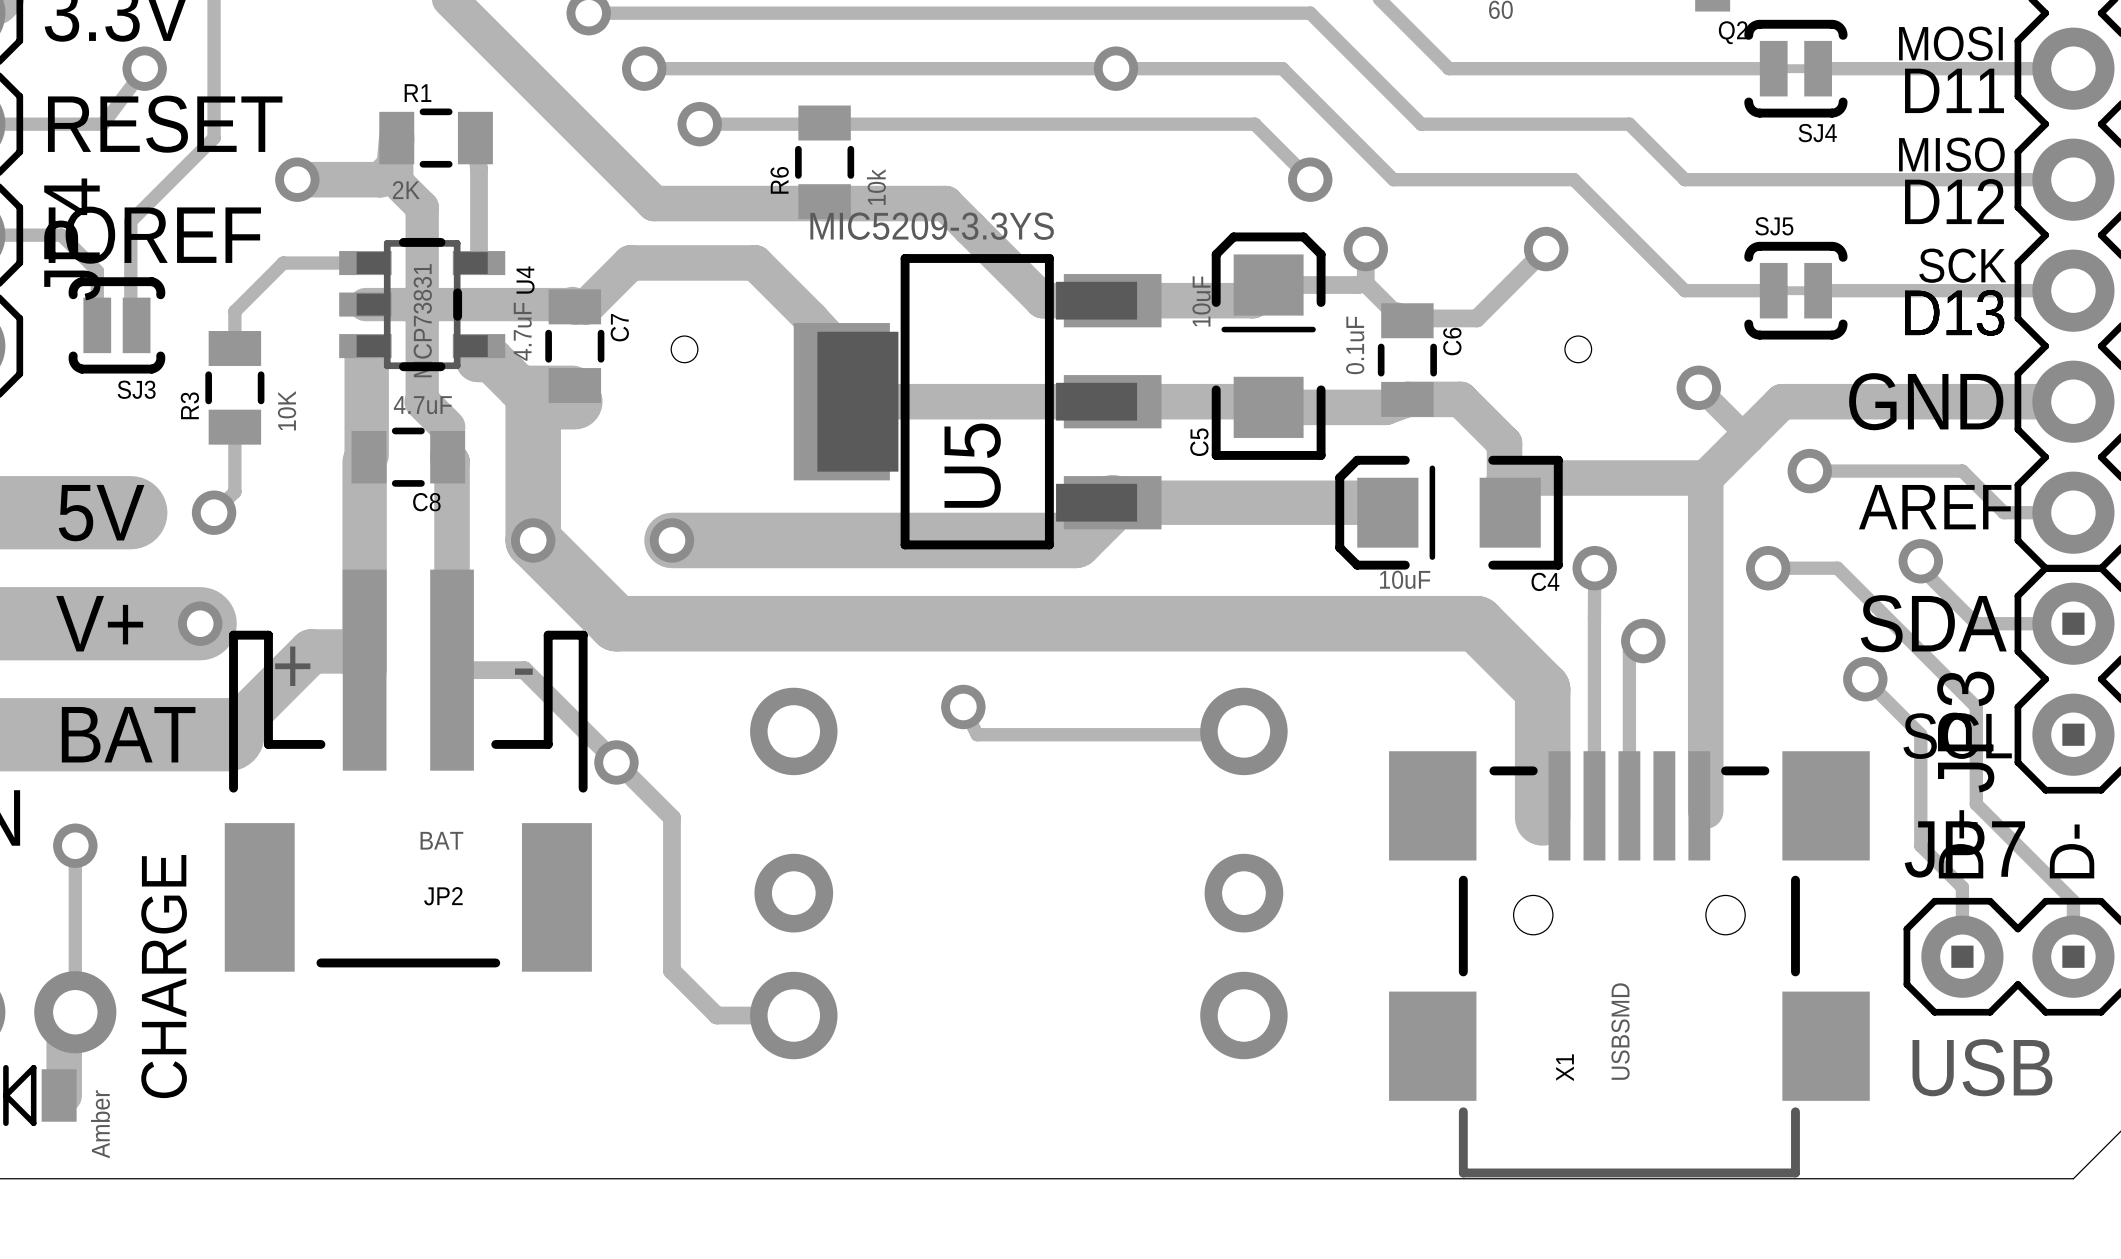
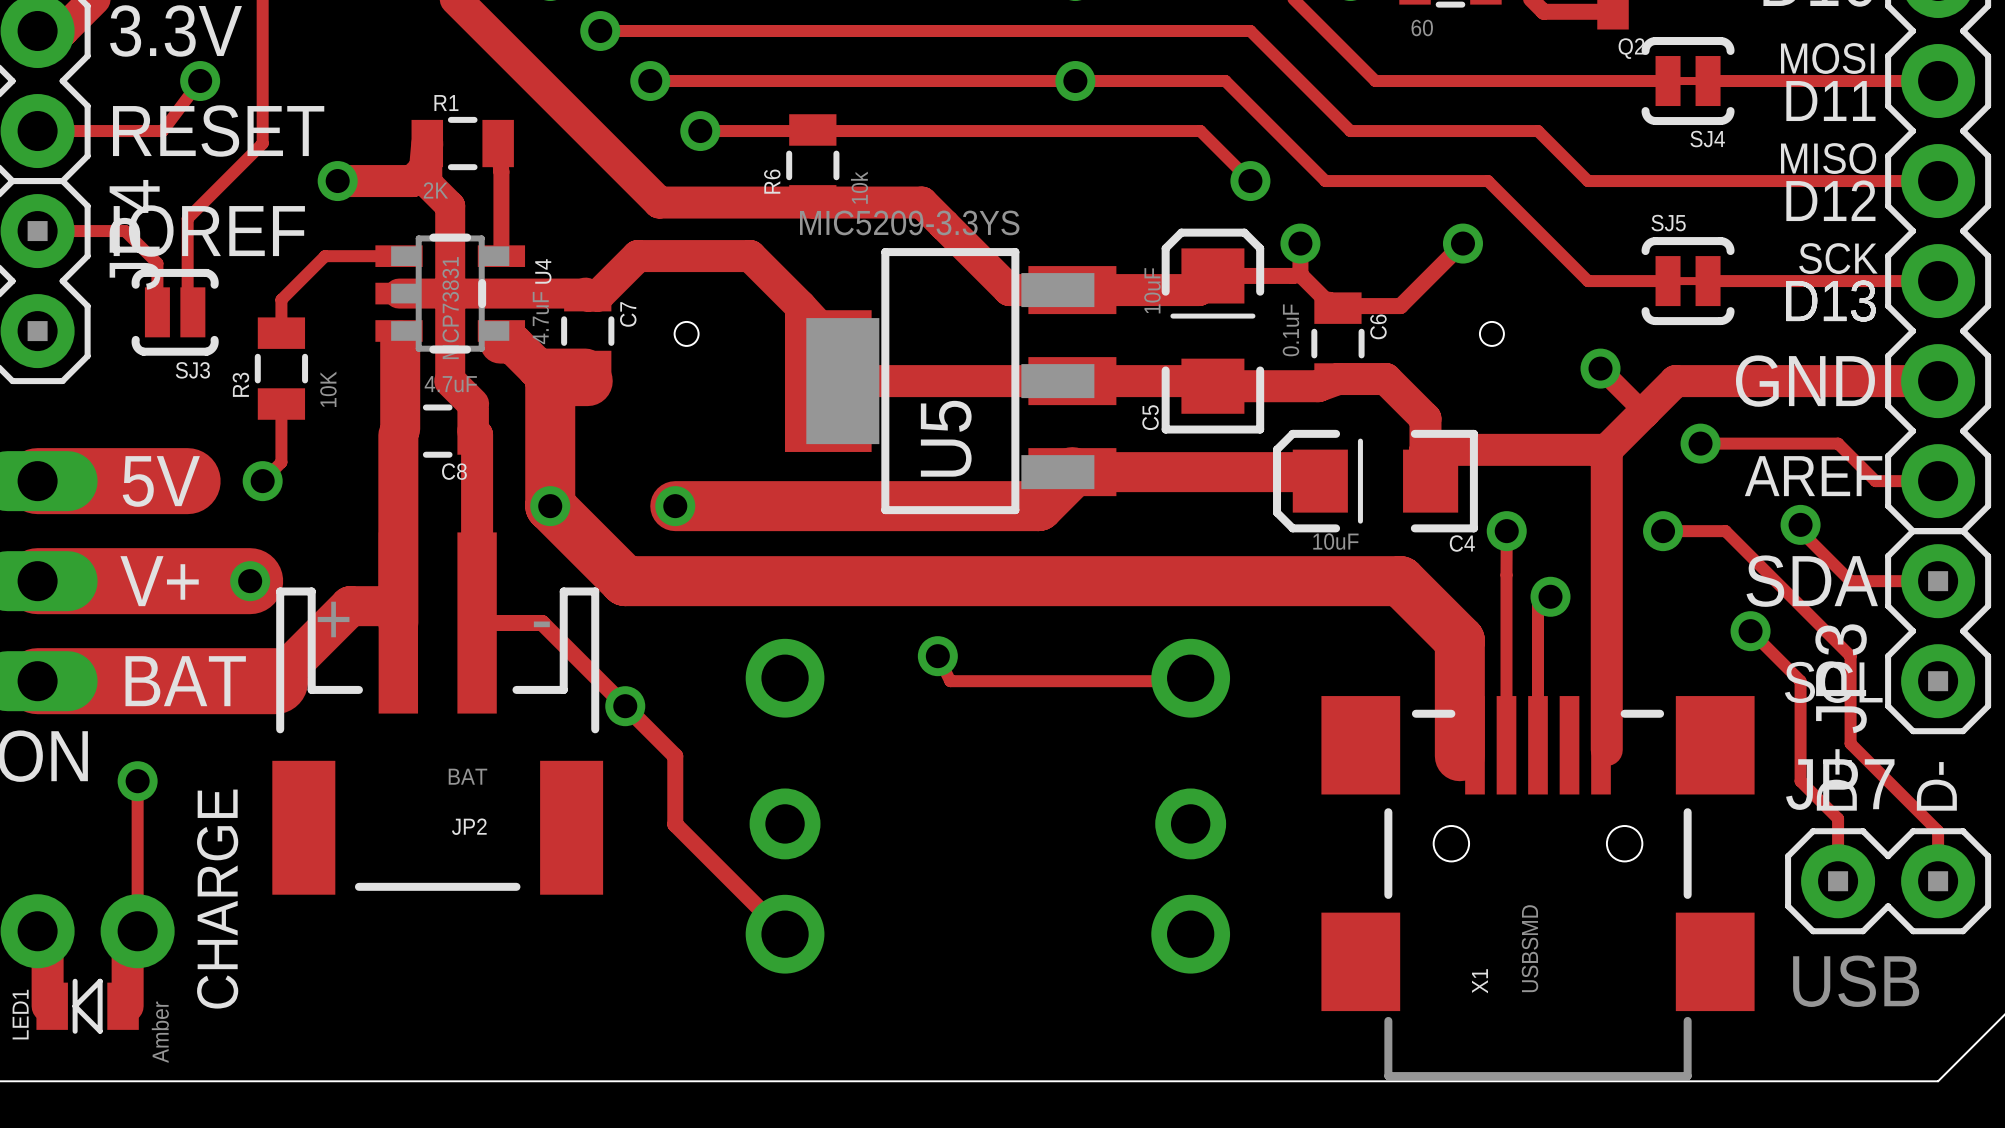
track: (671, 893) (671, 970) (716, 1015) (793, 1015) -> (675, 824) (785, 934)

